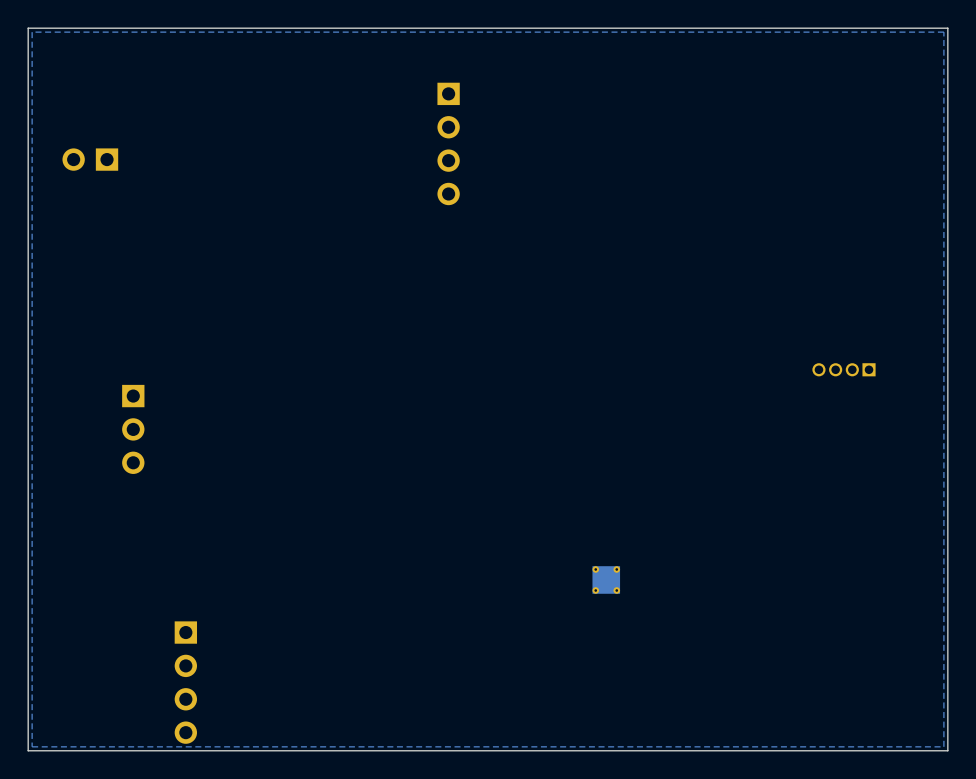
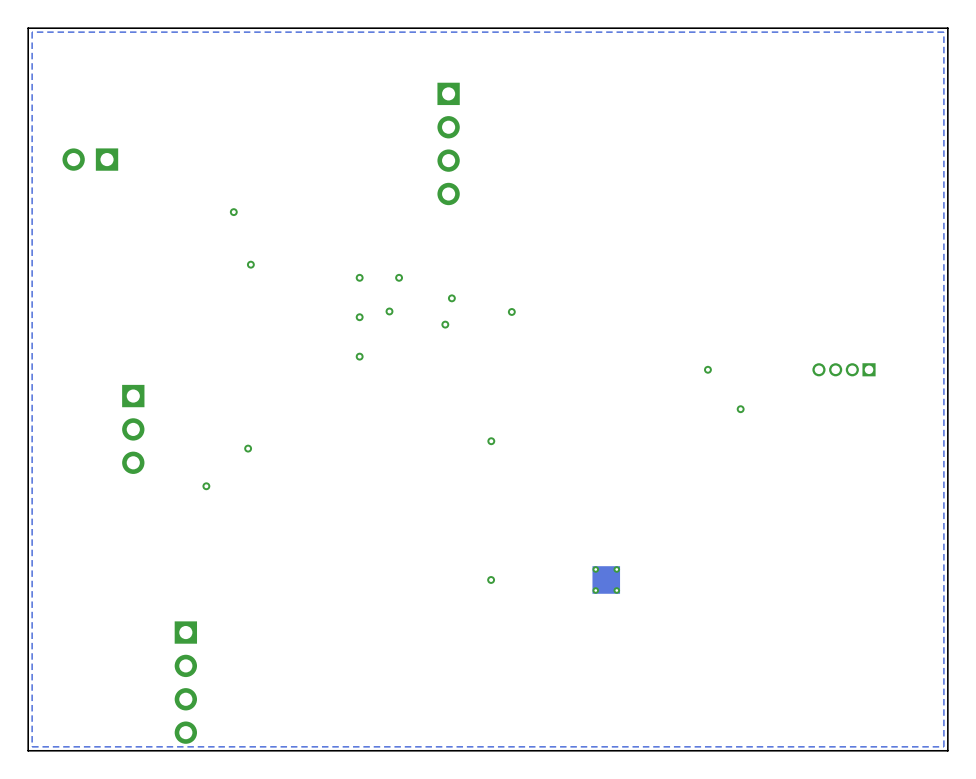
via: none -> (233, 212)
via: none -> (250, 264)
via: none -> (359, 277)
via: none -> (399, 277)
via: none -> (451, 298)
via: none -> (389, 311)
via: none -> (511, 311)
via: none -> (359, 317)
via: none -> (445, 324)
via: none -> (359, 356)
via: none -> (707, 369)
via: none -> (740, 409)
via: none -> (491, 441)
via: none -> (248, 448)
via: none -> (206, 486)
via: none -> (491, 579)

